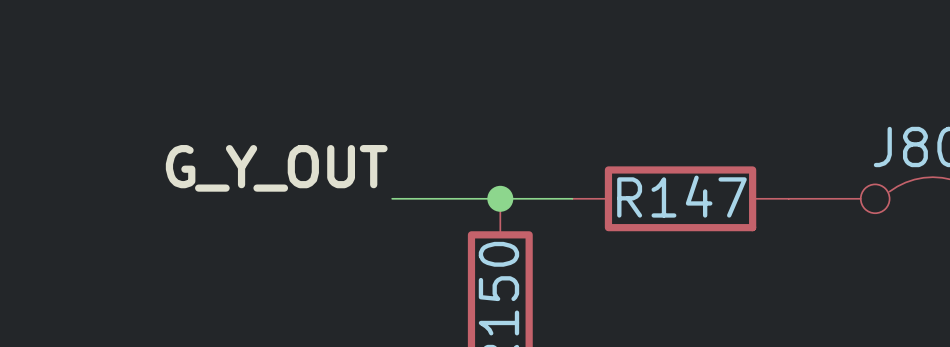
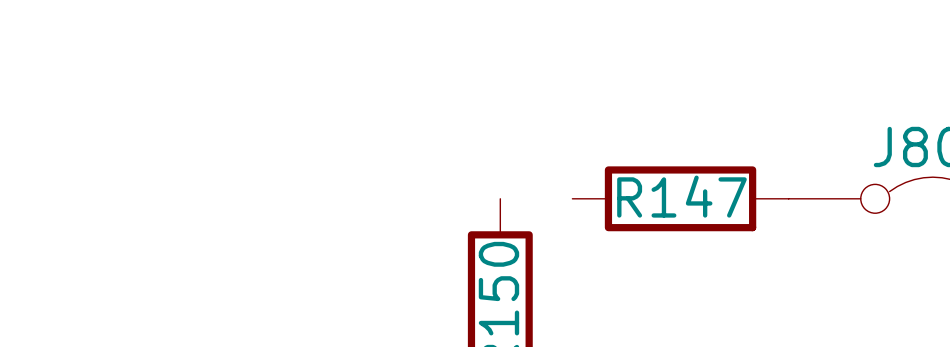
label: G_Y_OUT (276, 168) -> none
wire: (392, 198) (572, 198) -> none
junction: (500, 198) -> none

